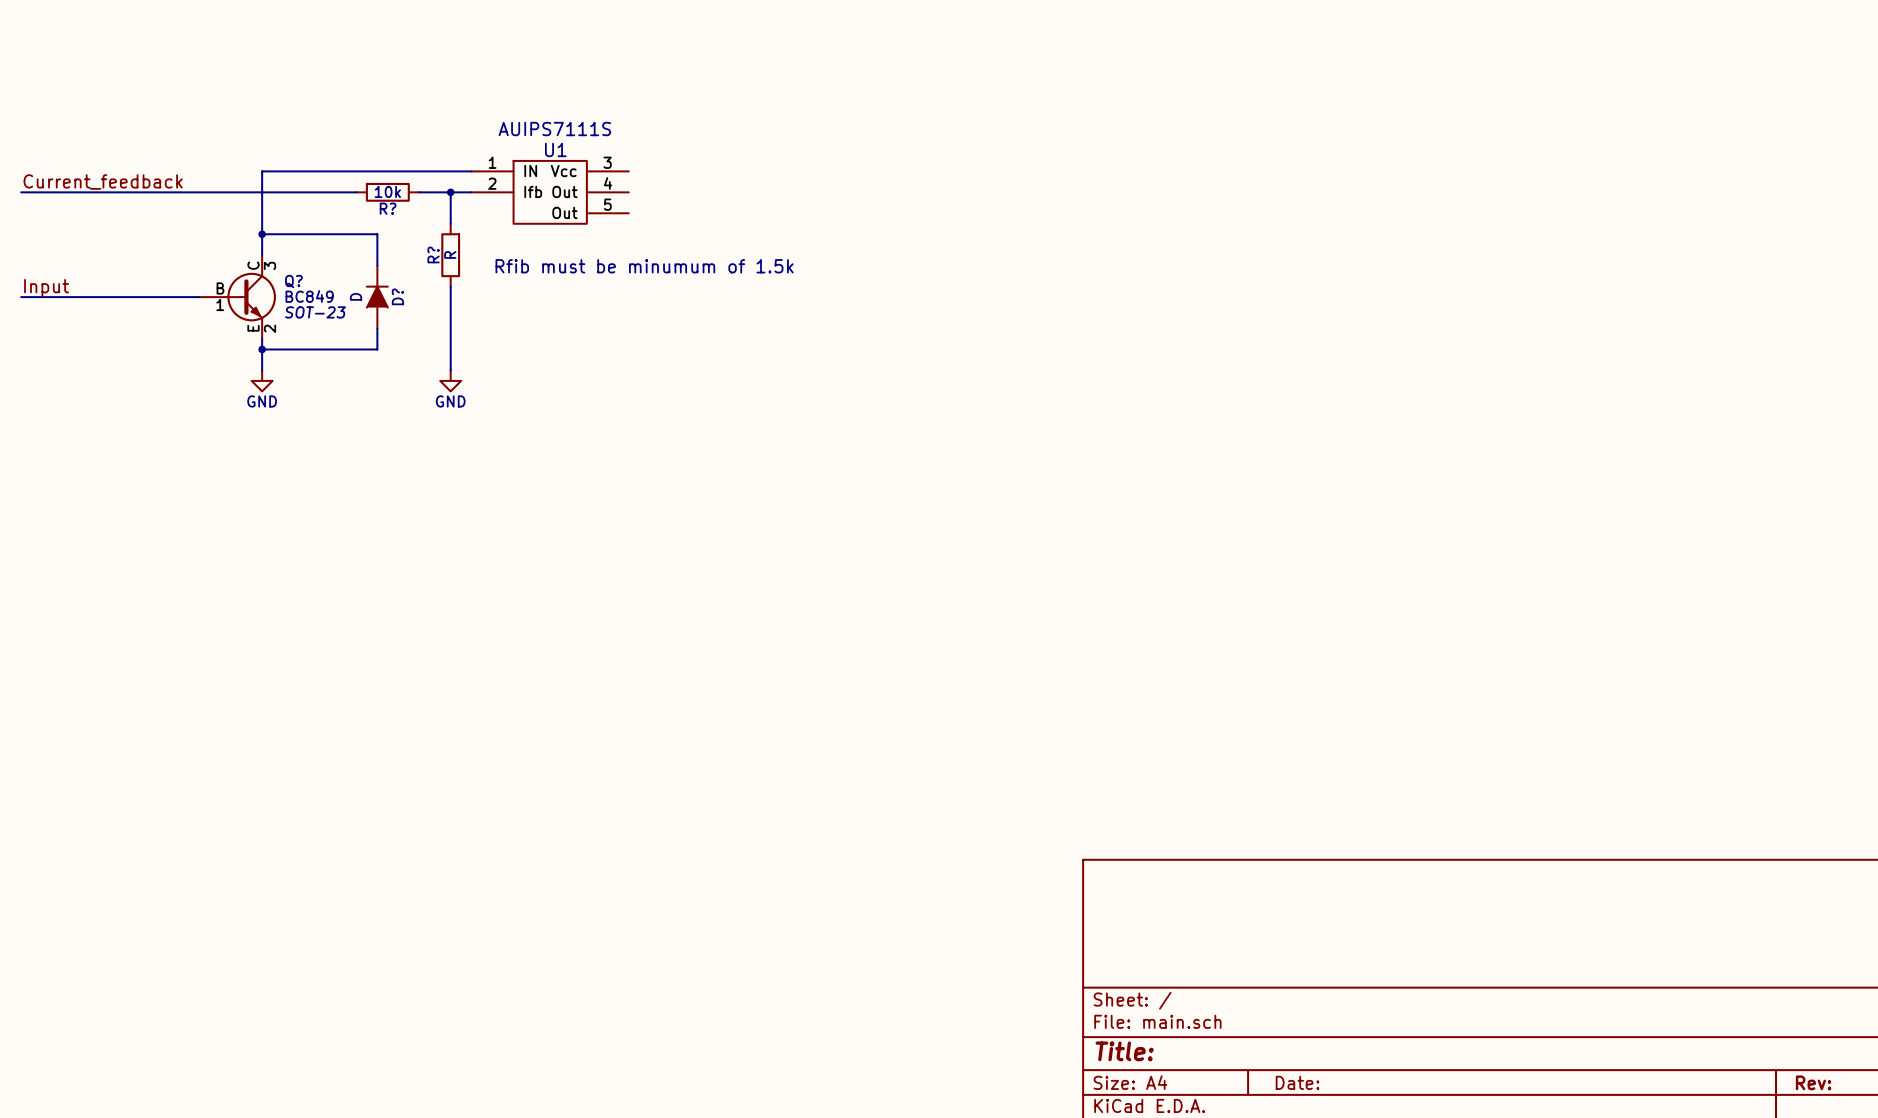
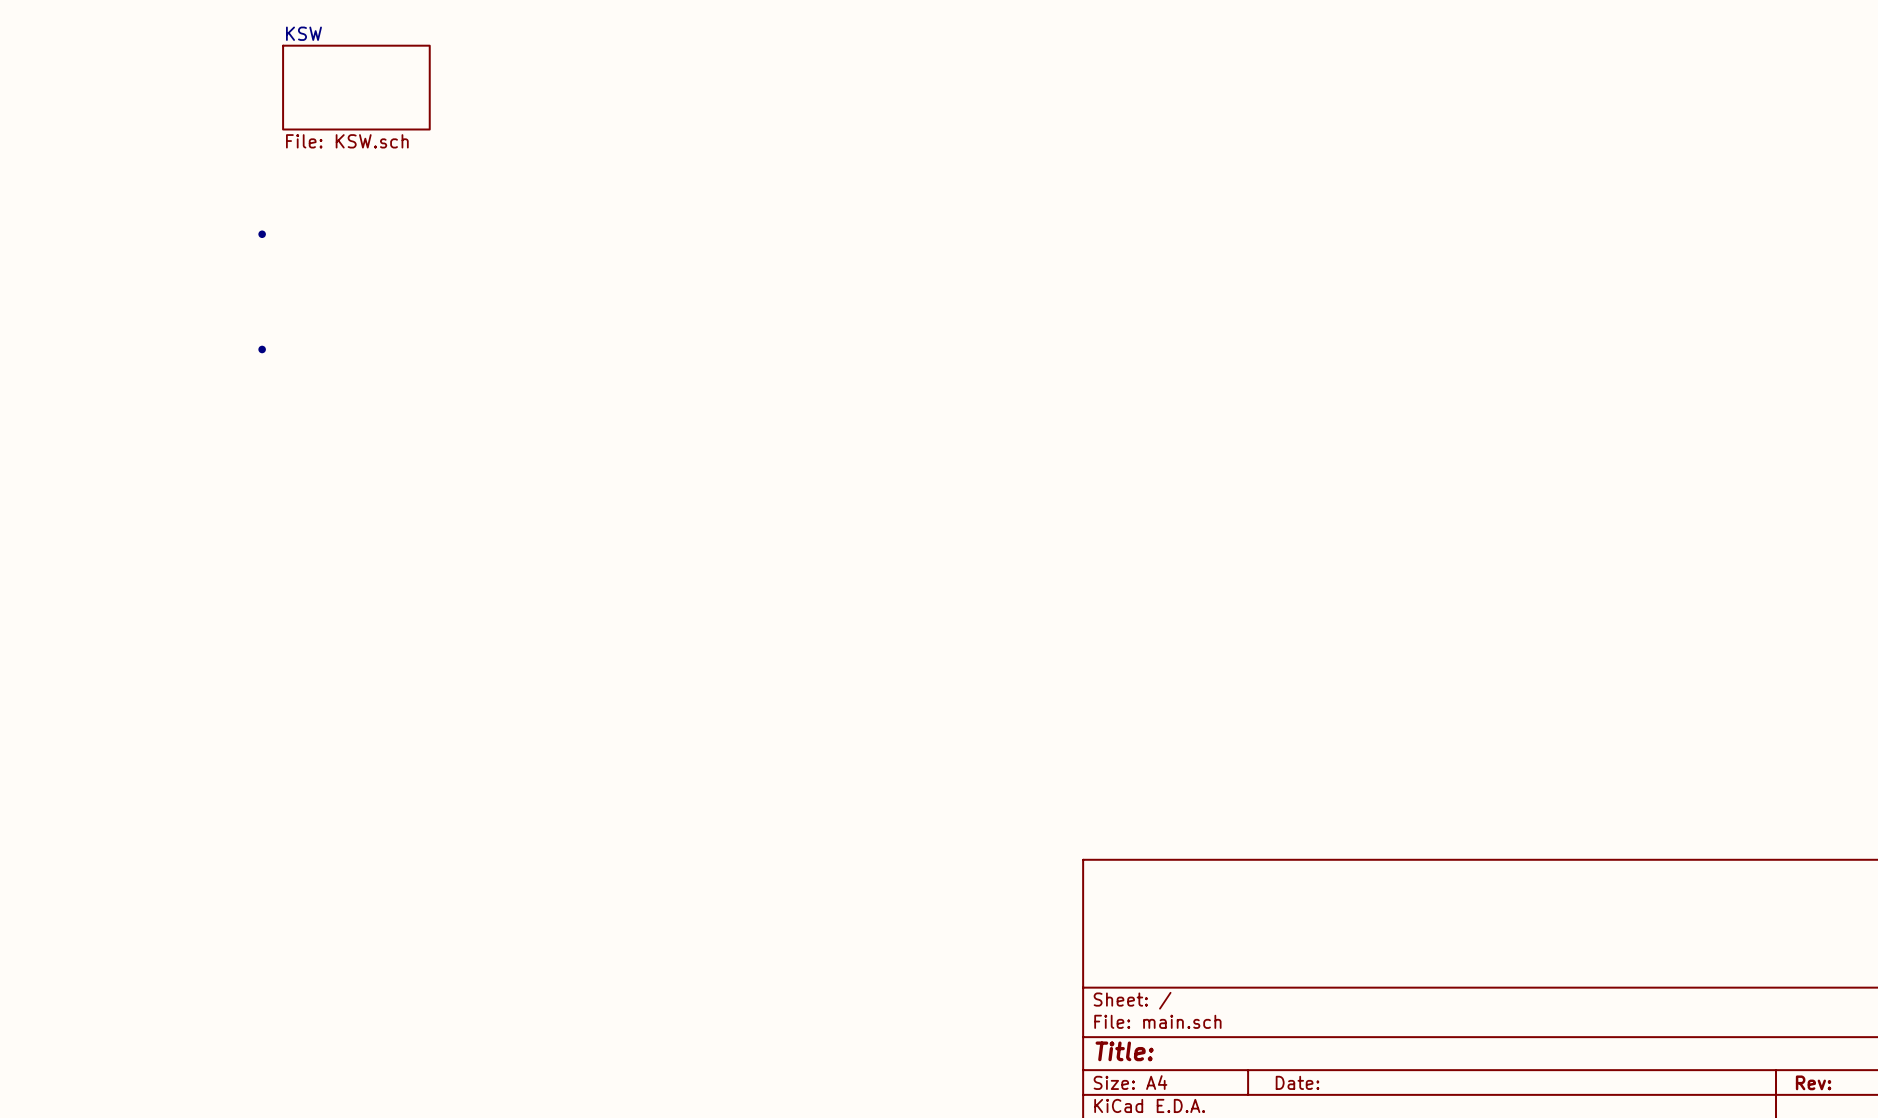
sheet KSW: none -> File: KSW.sch (356, 87)
wire: (471, 171) (262, 171) (262, 255) -> none
label: Current_feedback (103, 181) -> none
wire: (21, 192) (356, 192) -> none
R?: 10k (387, 192) -> none
wire: (419, 192) (471, 192) -> none
wire: (450, 192) (450, 223) -> none
junction: (450, 192) -> none
U1: AUIPS7111S (550, 192) -> none
wire: (262, 234) (377, 234) (377, 265) -> none
R?: R (450, 255) -> none
text: Rfib must be minumum of 1.5k (644, 266) -> none
wire: (450, 286) (450, 370) -> none
label: Input (46, 288) -> none
wire: (21, 297) (199, 297) -> none
Q?: BC849 (237, 297) -> none
D?: D (377, 297) -> none
wire: (377, 328) (377, 349) (262, 349) -> none
wire: (262, 339) (262, 370) -> none
power symbol: GND (262, 380) -> none
power symbol: GND (450, 380) -> none

